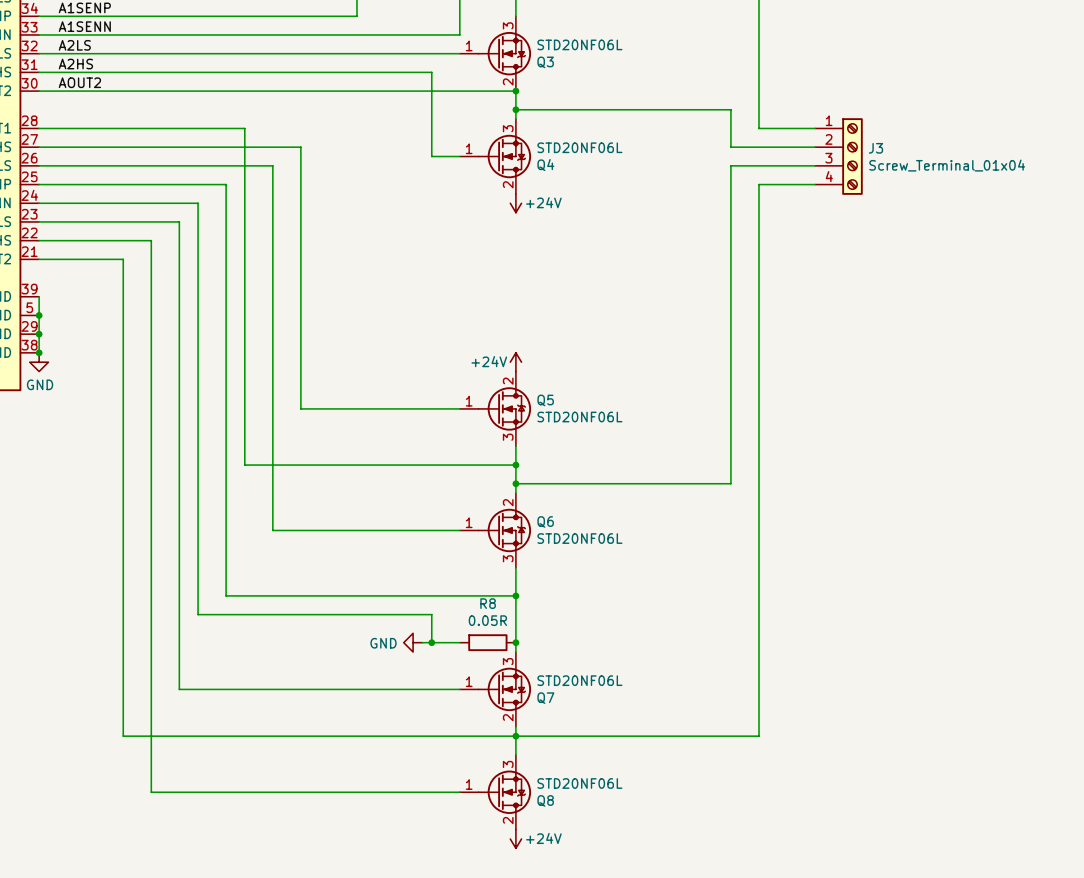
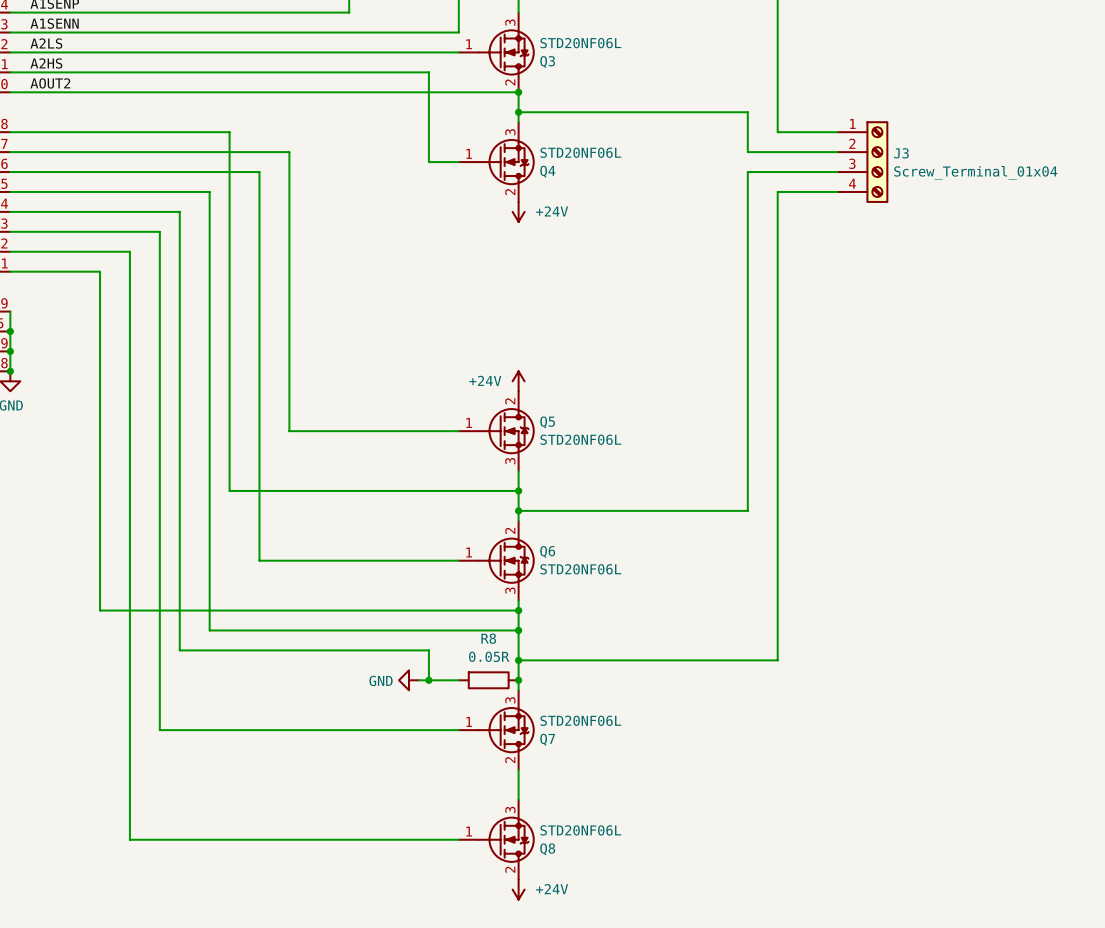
wire: (123, 577) (123, 736) (758, 736) (758, 623) -> (100, 610) (518, 610)
junction: none -> (518, 610)
wire: none -> (518, 660) (777, 660)
junction: none -> (518, 660)
junction: (515, 736) -> none

